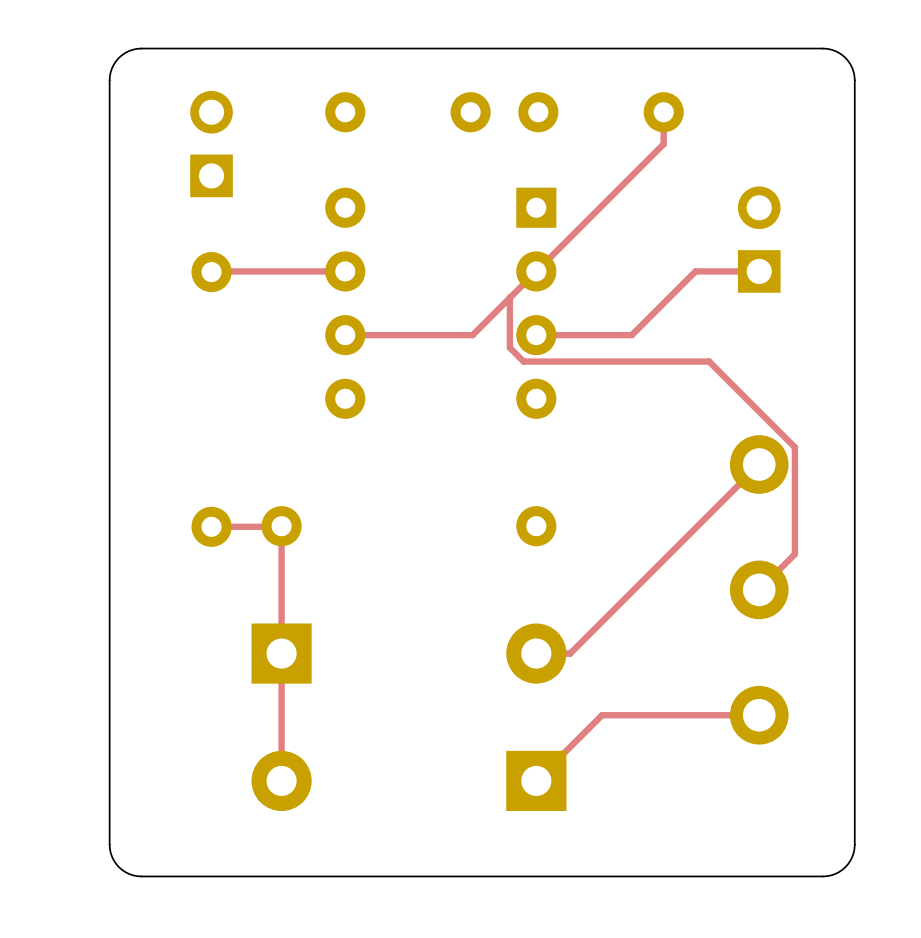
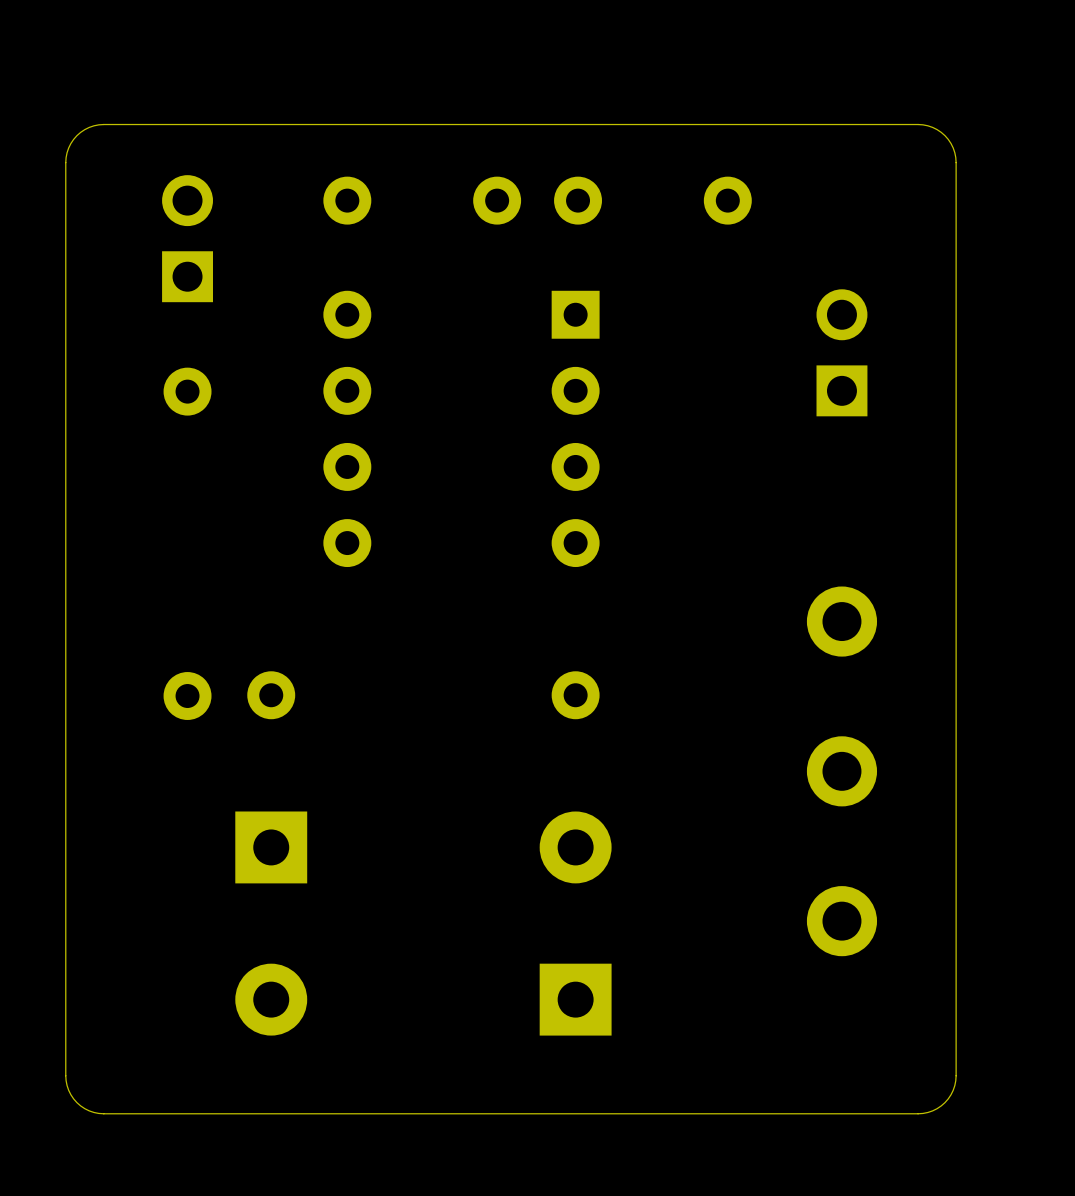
top track: (663, 112) (663, 144) (472, 335) (345, 335) -> none
top track: (345, 271) (211, 272) -> none
top track: (759, 271) (695, 271) (631, 335) (536, 335) -> none
top track: (509, 297) (509, 347) (523, 361) (709, 361) (794, 447) (794, 554) (759, 589) -> none
top track: (759, 464) (570, 653) (536, 653) -> none
top track: (211, 526) (281, 526) (281, 780) -> none
top track: (759, 715) (602, 715) (536, 780) -> none

